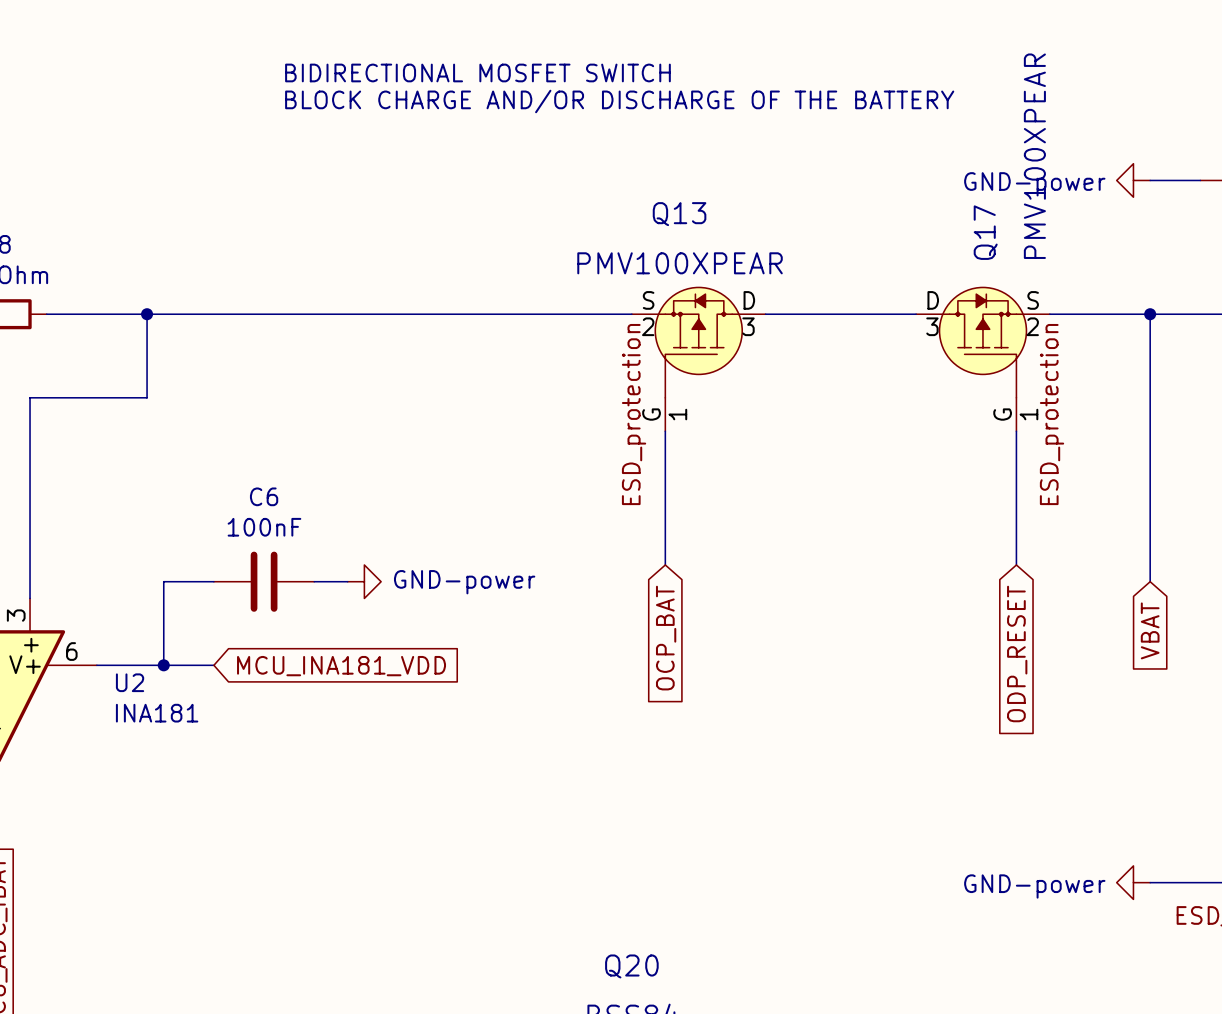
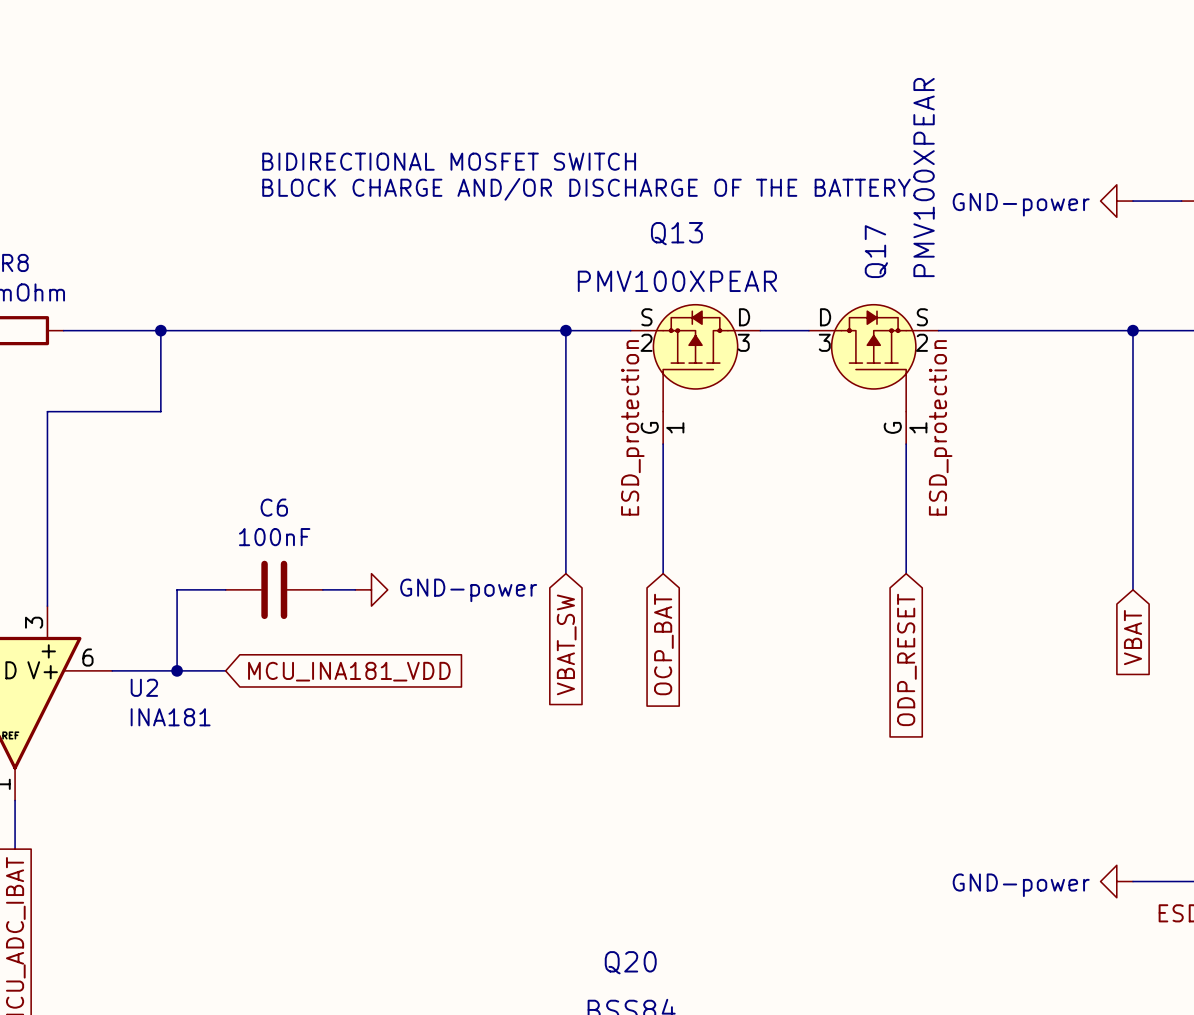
text position: BIDIRECTIONAL MOSFET SWITCH (477, 72) -> BIDIRECTIONAL MOSFET SWITCH (449, 161)
text position: BLOCK CHARGE AND/OR DISCHARGE OF THE BATTERY (619, 101) -> BLOCK CHARGE AND/OR DISCHARGE OF THE BATTERY (586, 189)
wire: none -> (565, 330) (565, 573)
junction: none -> (565, 330)
Q17 position: (982, 359) -> (873, 374)
wire: (1016, 431) (1016, 565) -> (906, 444) (906, 573)
global label: none -> VBAT_SW (566, 644)
global label position: ODP_RESET (1017, 653) -> ODP_RESET (906, 659)

